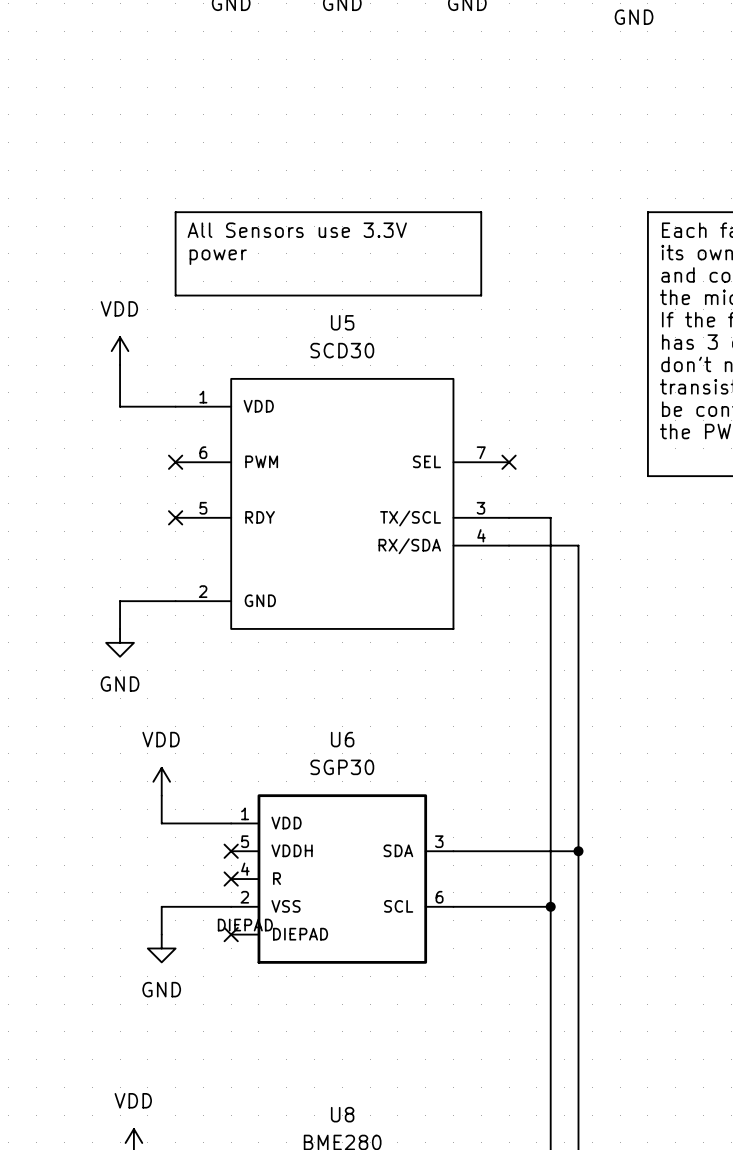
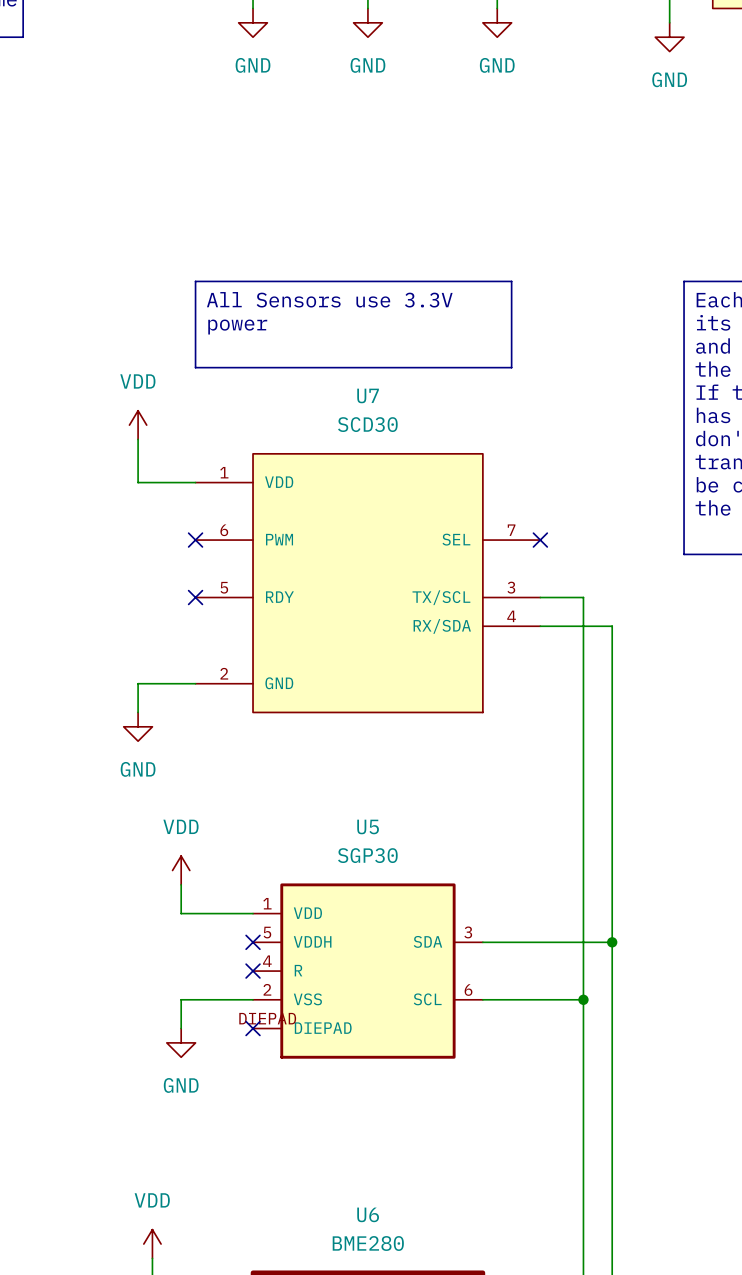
U5 name: U5 (342, 322) -> U7 (368, 395)
U6 name: U6 (342, 739) -> U5 (368, 826)
U8 name: U8 (342, 1114) -> U6 (368, 1214)

